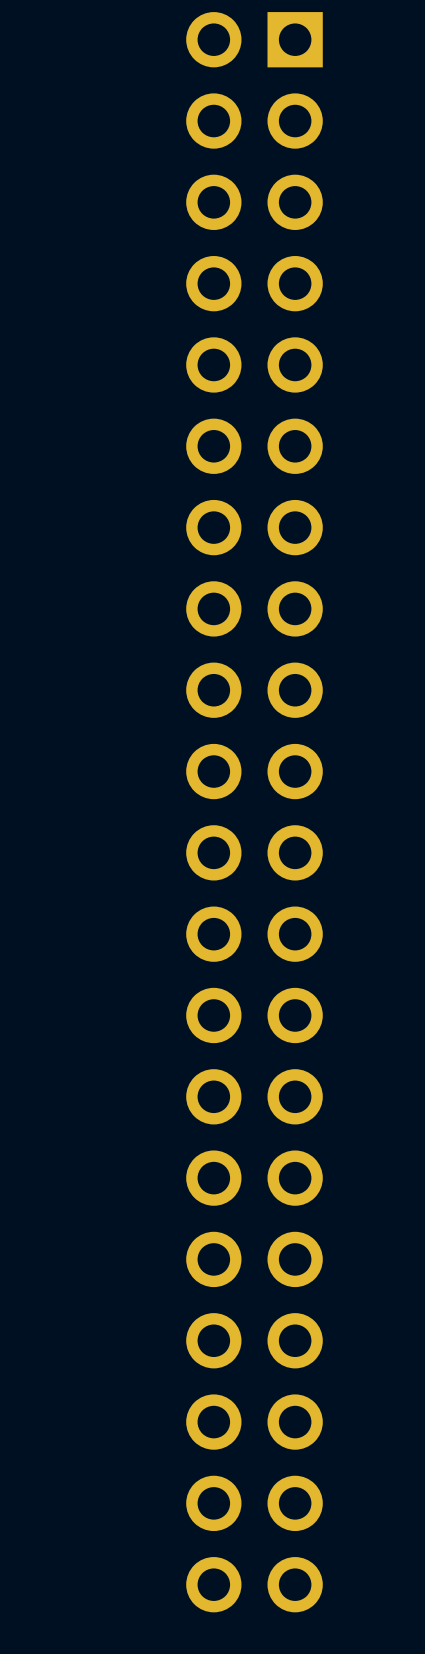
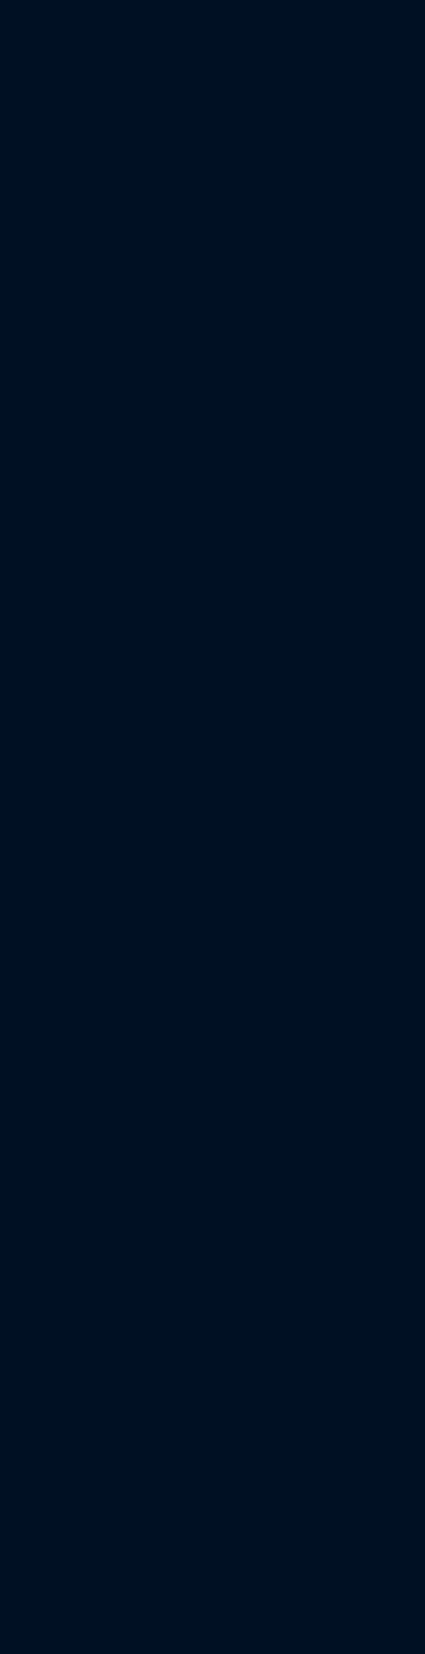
part: (254, 812) -> none

